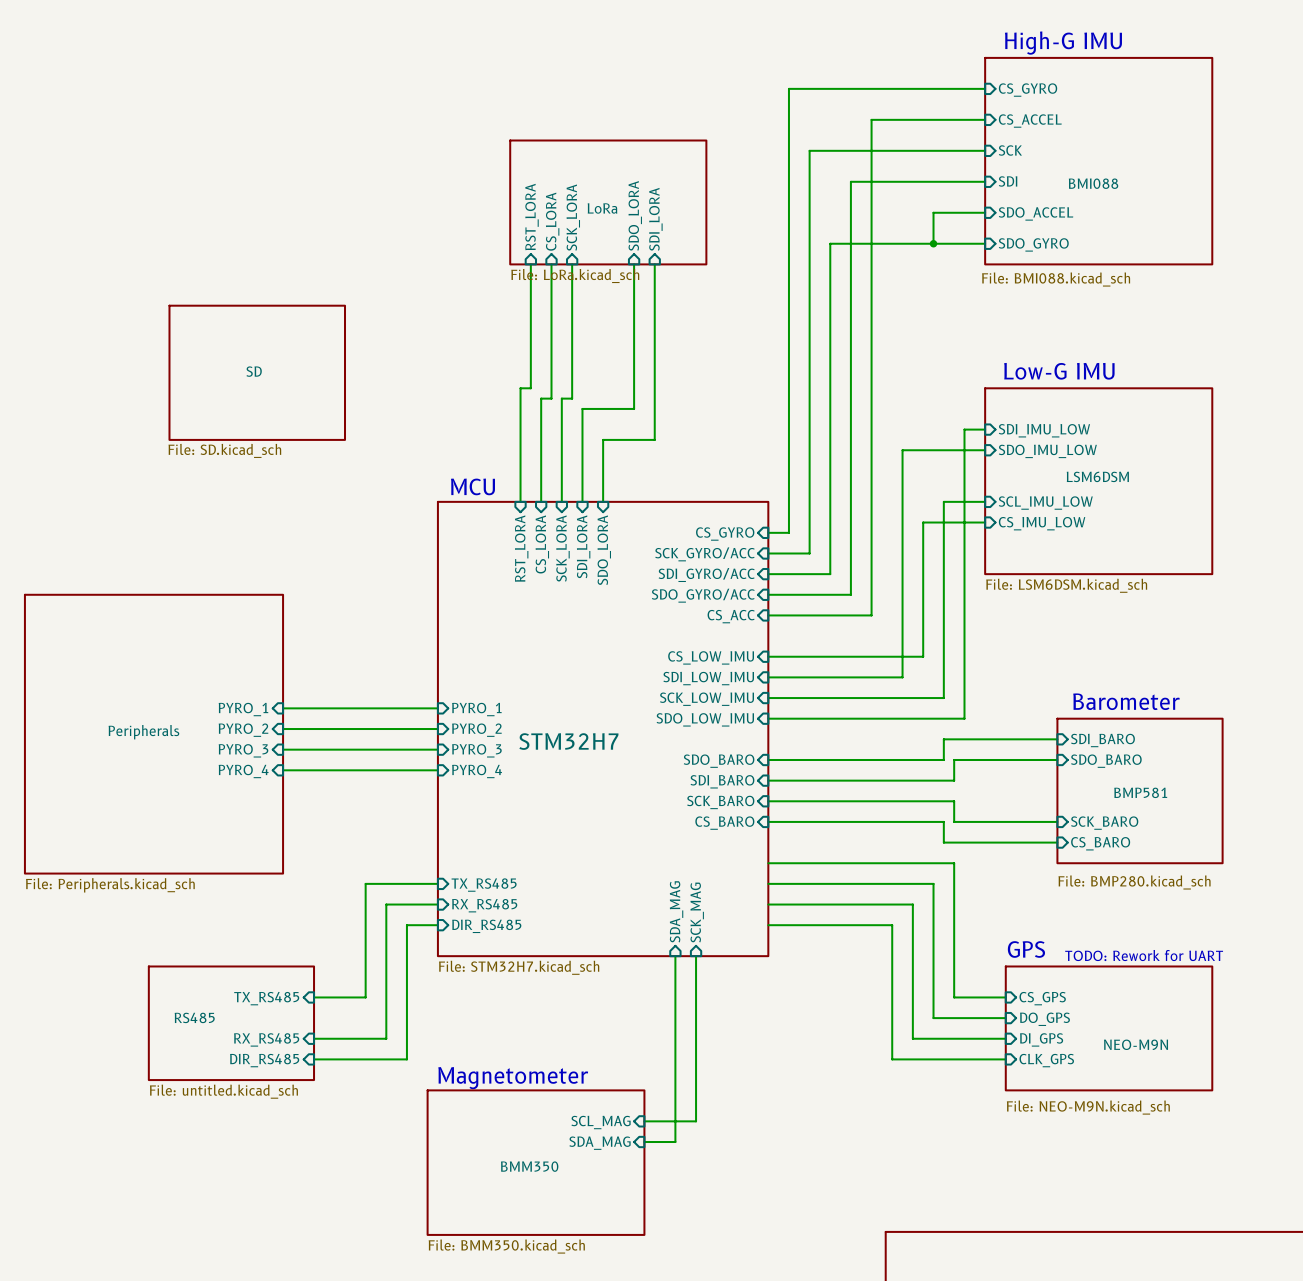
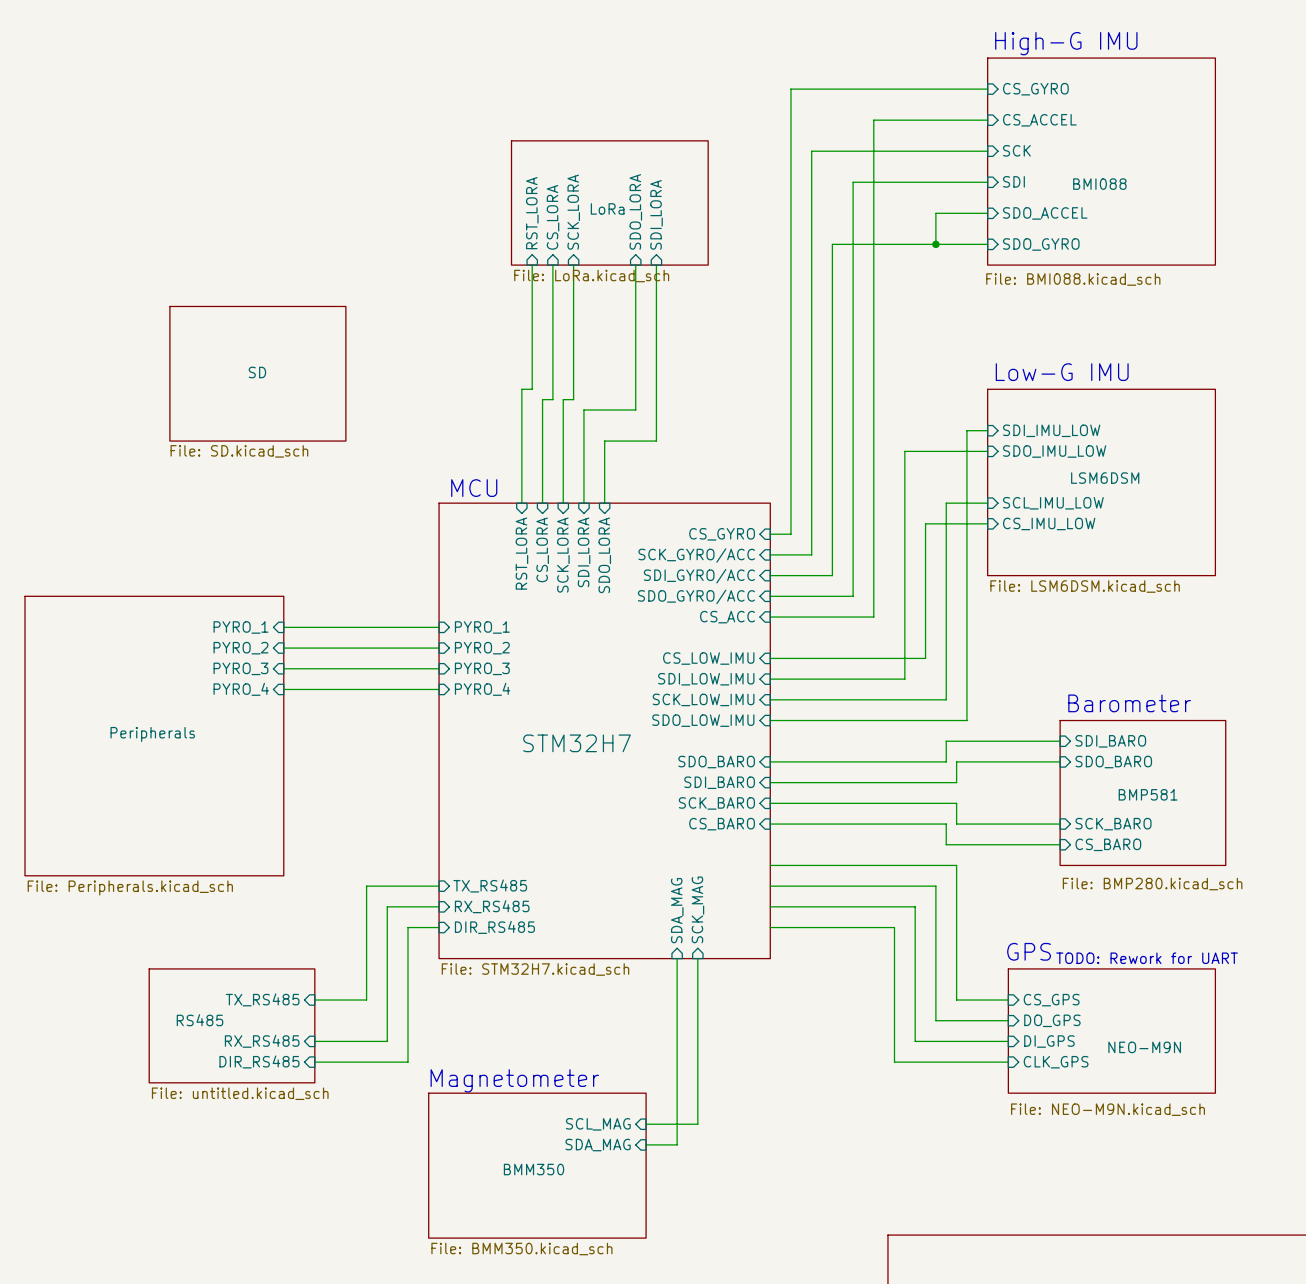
wire: (283, 708) (437, 708) -> (283, 627) (439, 627)
sheet pin position: PYRO_1 (243, 709) -> PYRO_1 (240, 627)
sheet pin position: PYRO_1 (476, 709) -> PYRO_1 (482, 627)
wire: (283, 729) (437, 729) -> (283, 648) (439, 648)
sheet pin position: PYRO_2 (243, 730) -> PYRO_2 (240, 648)
sheet pin position: PYRO_2 (476, 730) -> PYRO_2 (482, 648)
wire: (283, 749) (437, 749) -> (283, 668) (439, 668)
sheet pin position: PYRO_3 (243, 750) -> PYRO_3 (240, 668)
sheet pin position: PYRO_3 (476, 750) -> PYRO_3 (482, 668)
wire: (283, 770) (437, 770) -> (283, 689) (439, 689)
sheet pin position: PYRO_4 (243, 771) -> PYRO_4 (241, 689)
sheet pin position: PYRO_4 (477, 771) -> PYRO_4 (482, 689)

